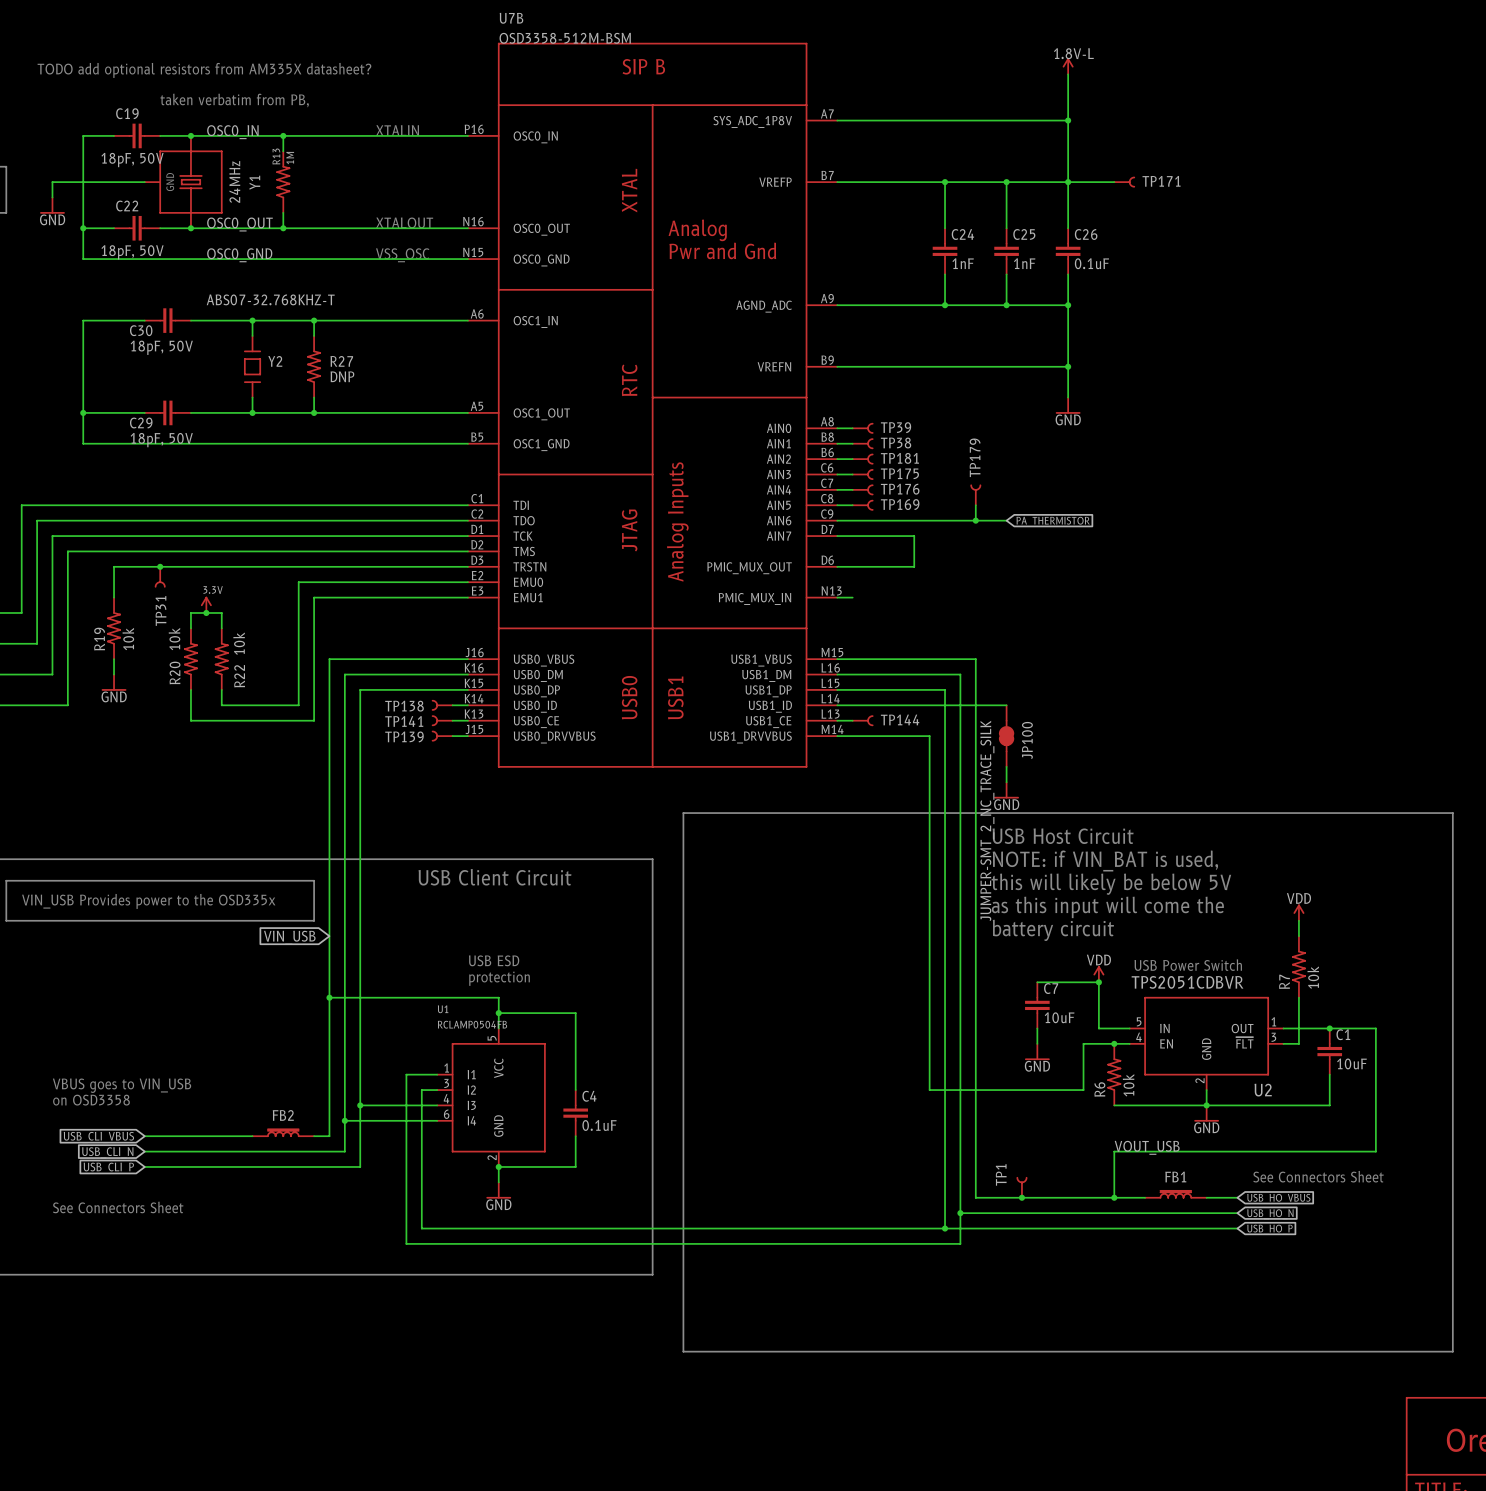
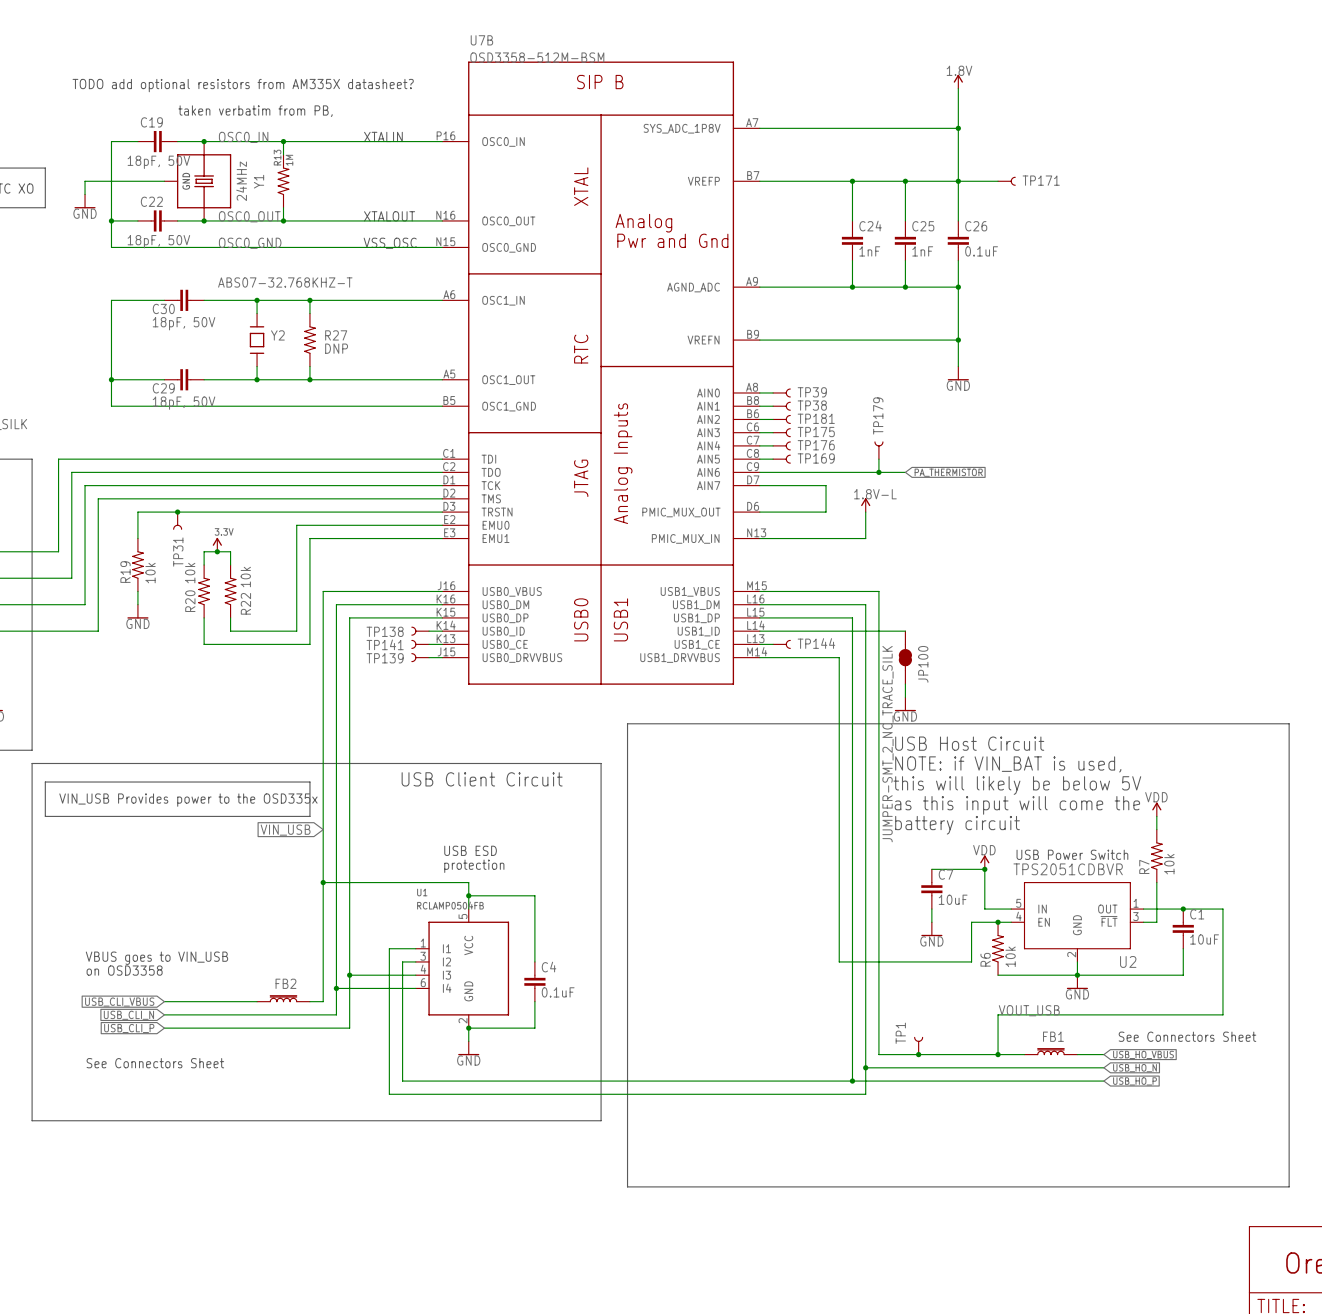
power symbol: 1.8V-L (1068, 66) -> 1.8V (958, 81)
power symbol: none -> 1.8V-L (865, 505)
wire: none -> (865, 512) (865, 538) (773, 538)

